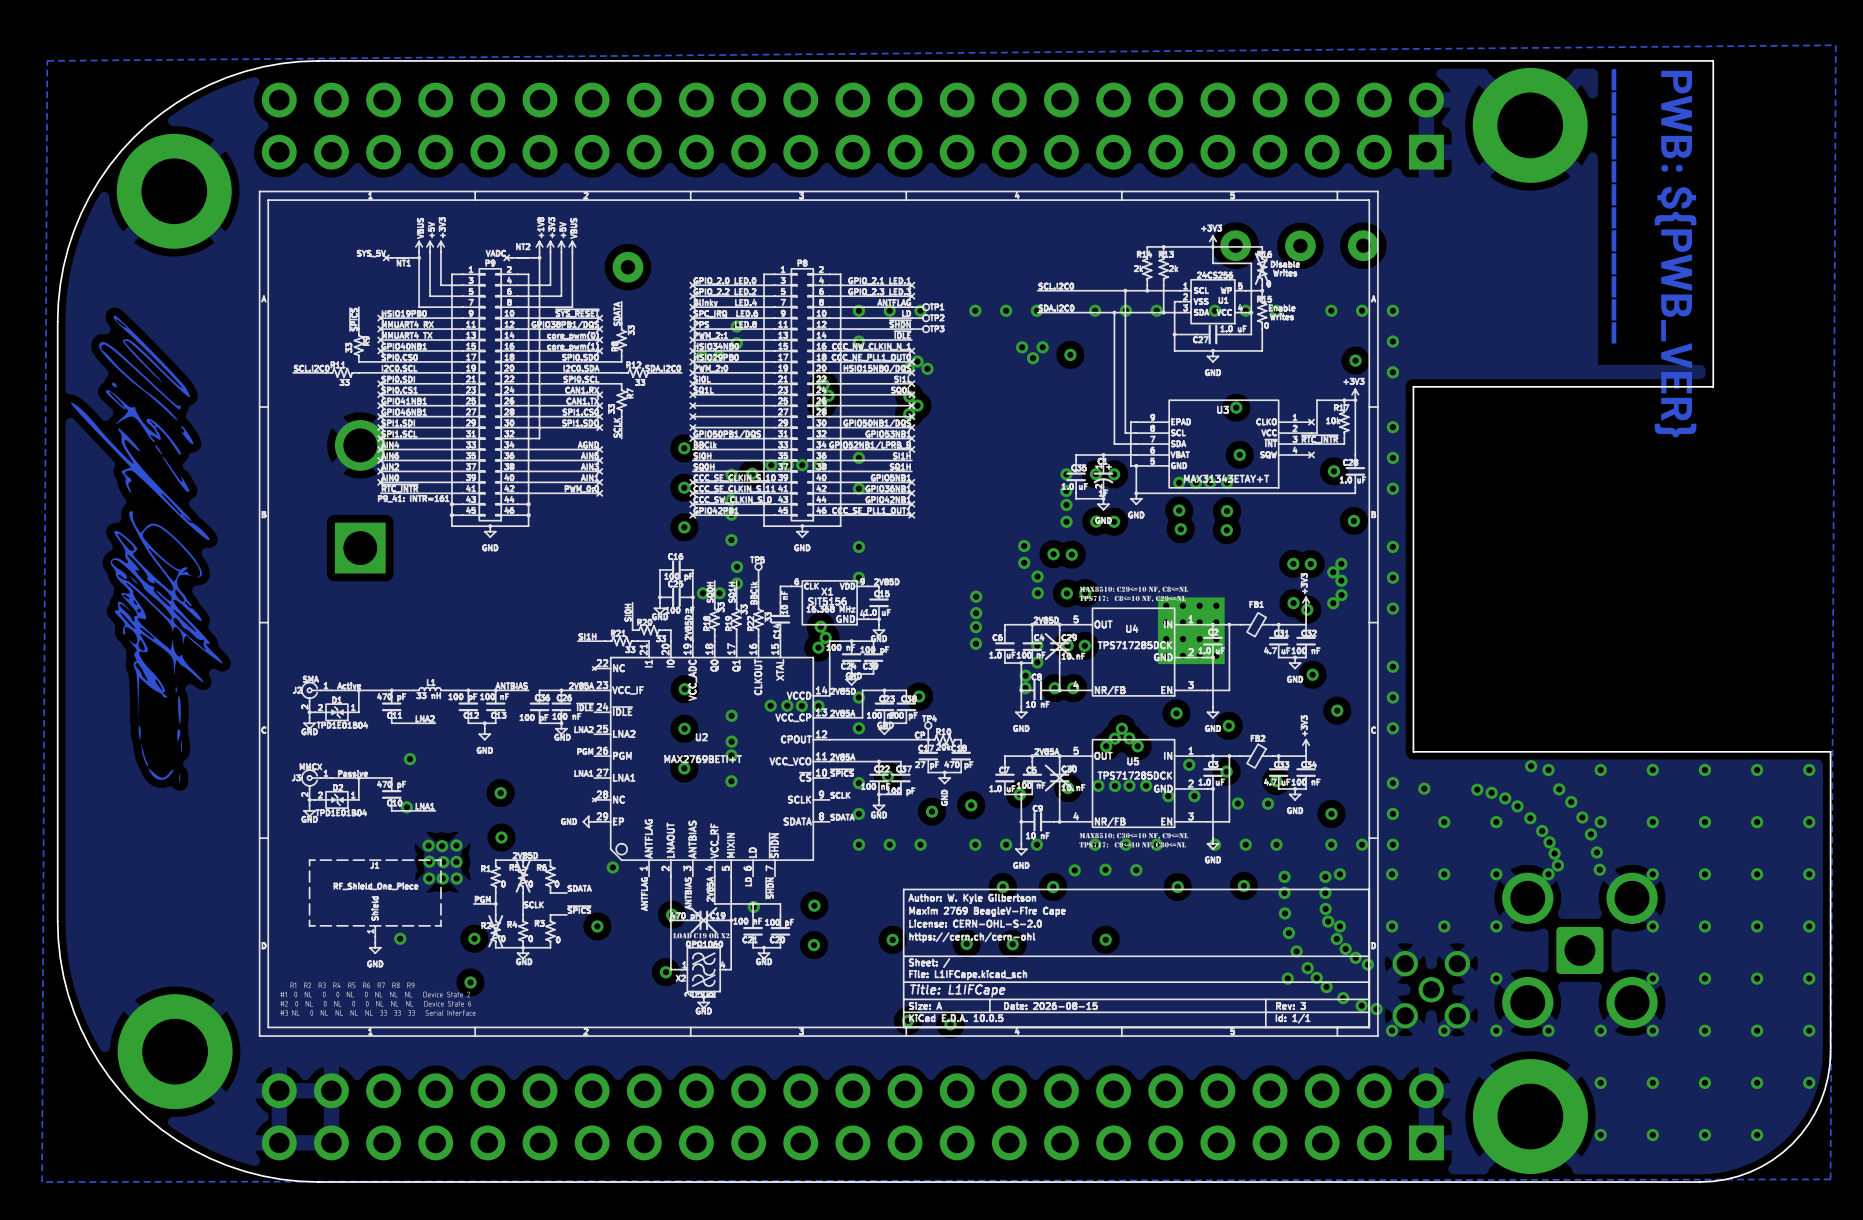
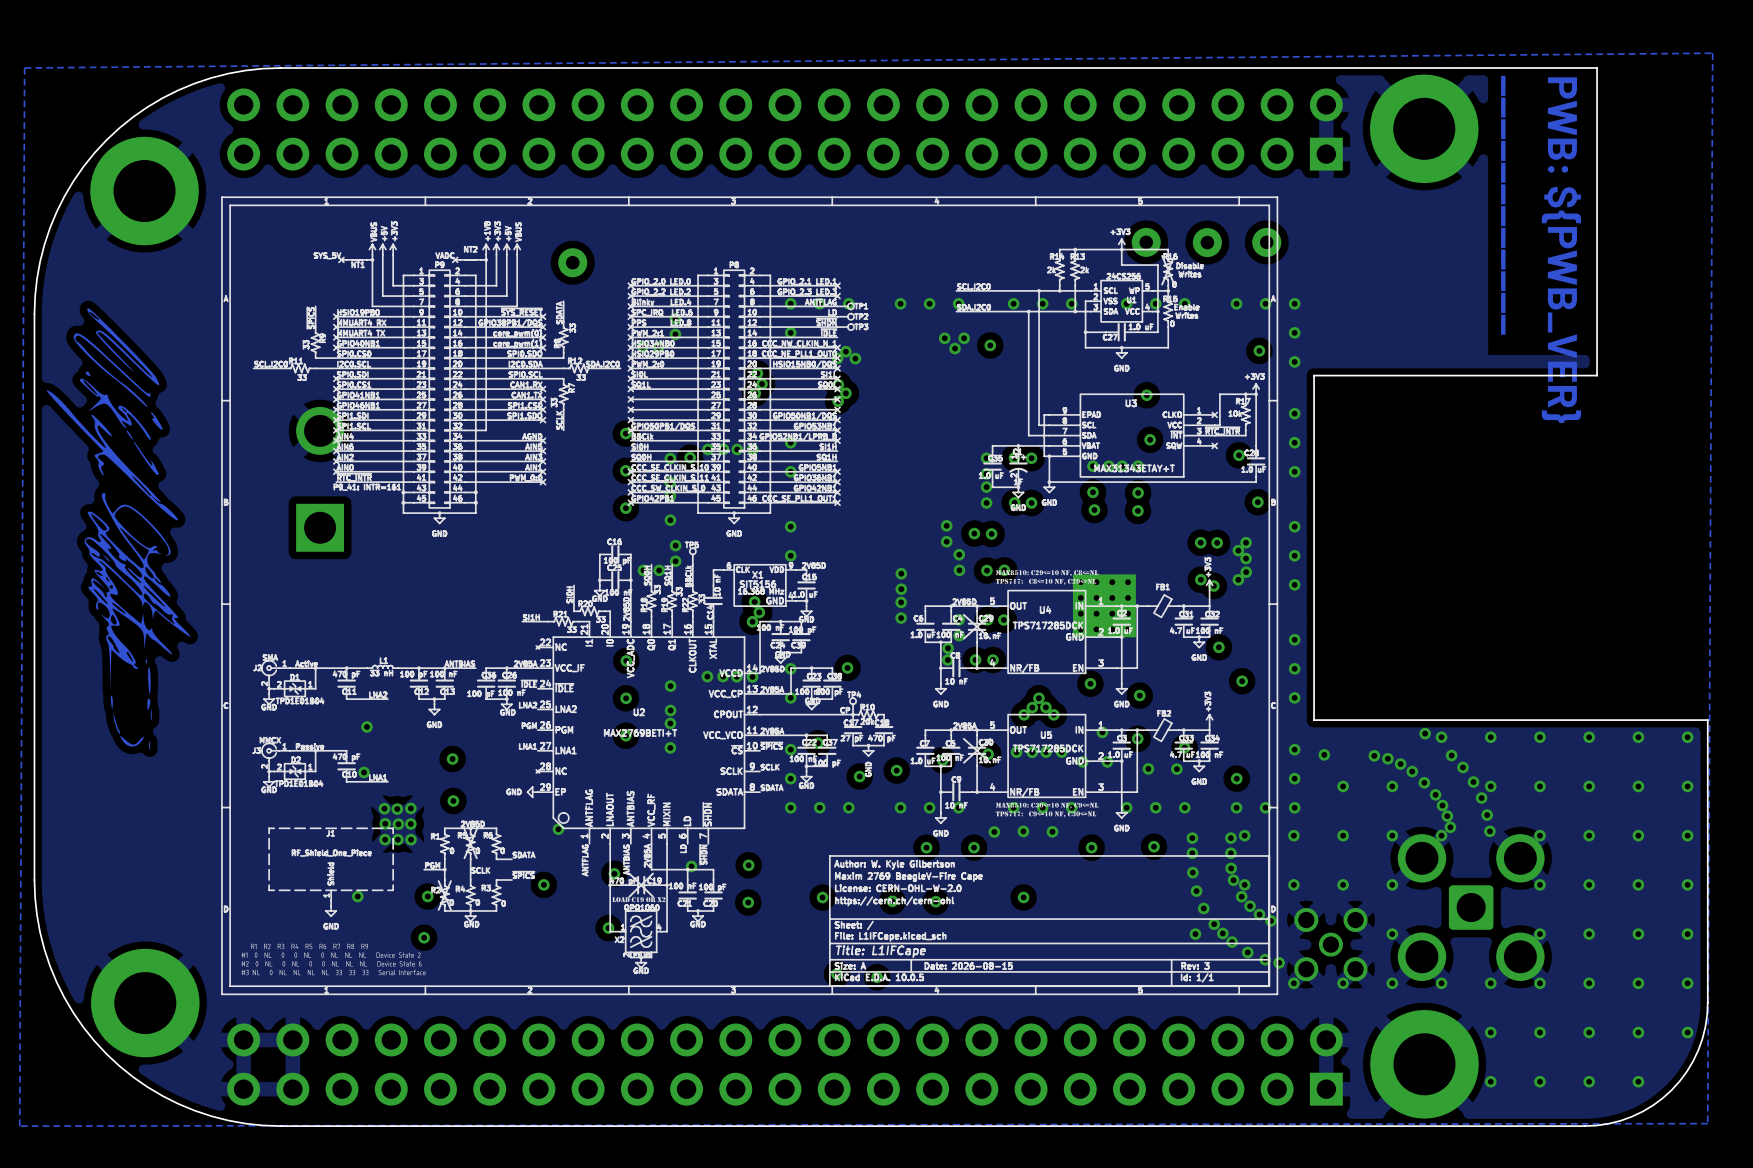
drawing shape: [259, 191, 1379, 1037] -> [221, 196, 1278, 995]

